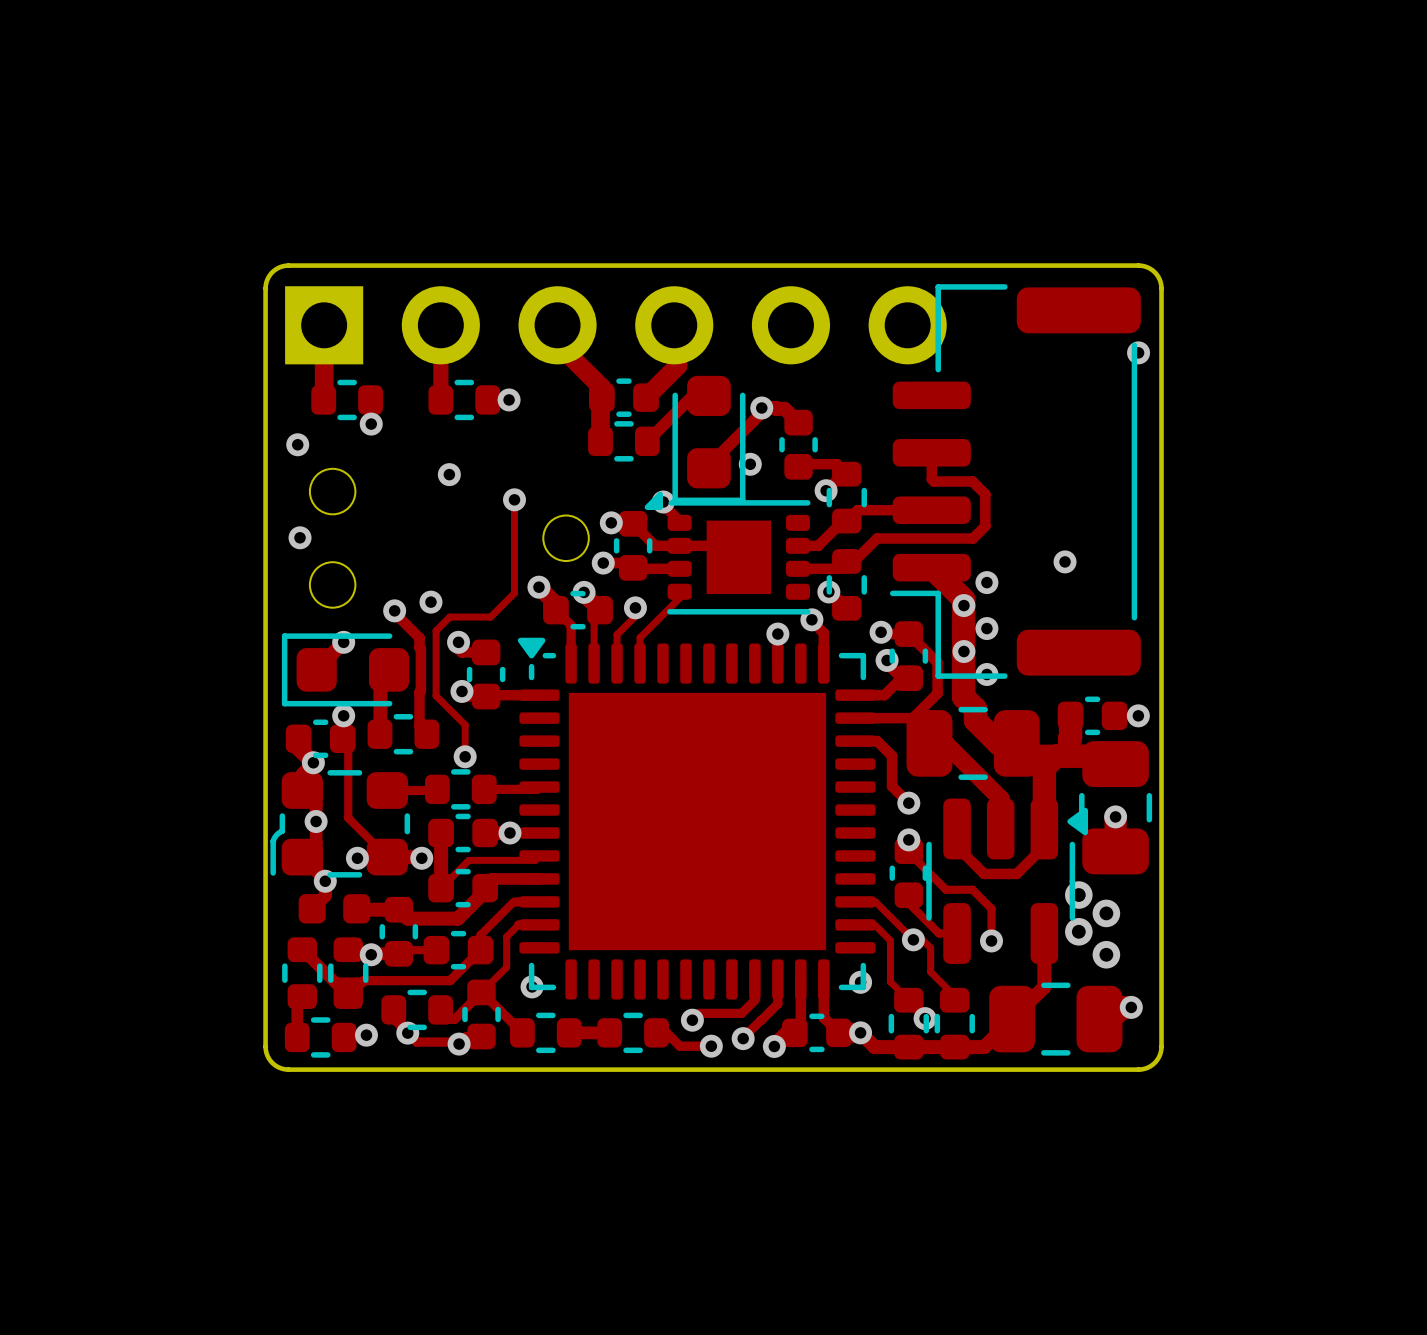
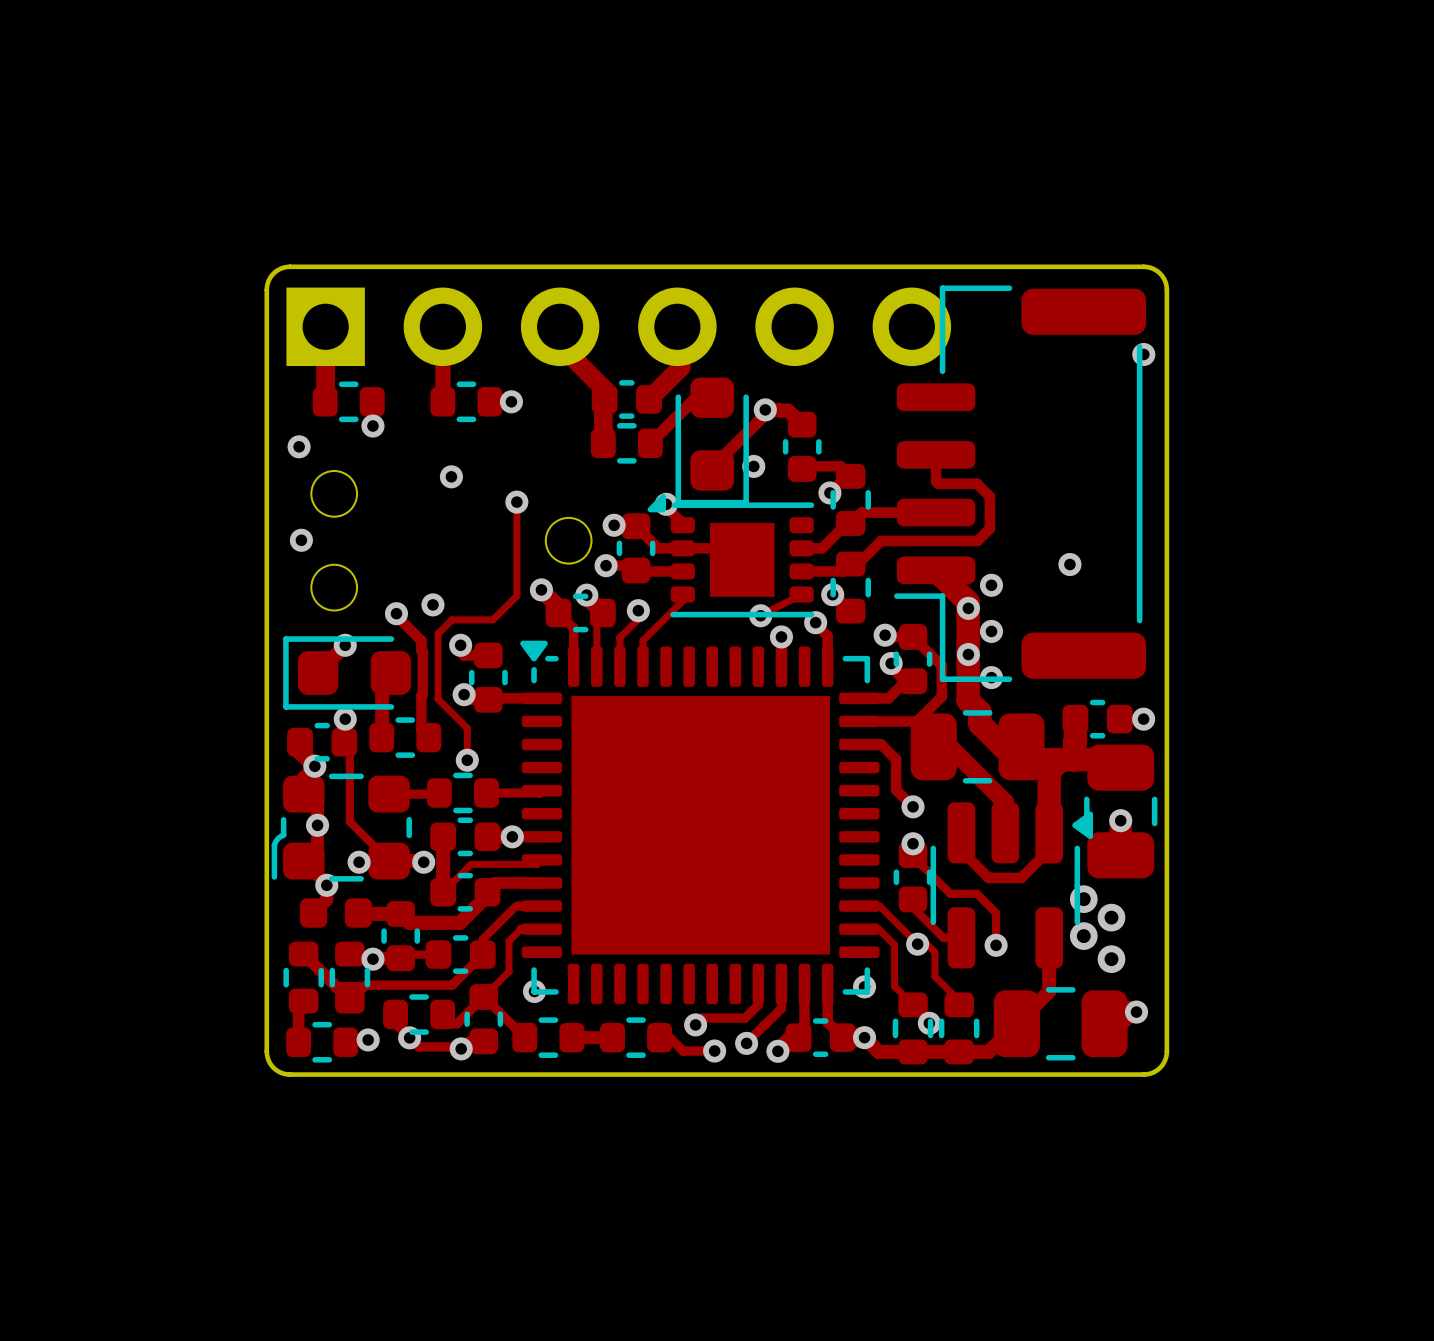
track: none -> (801, 594) (760, 615)
via: none -> (760, 615)

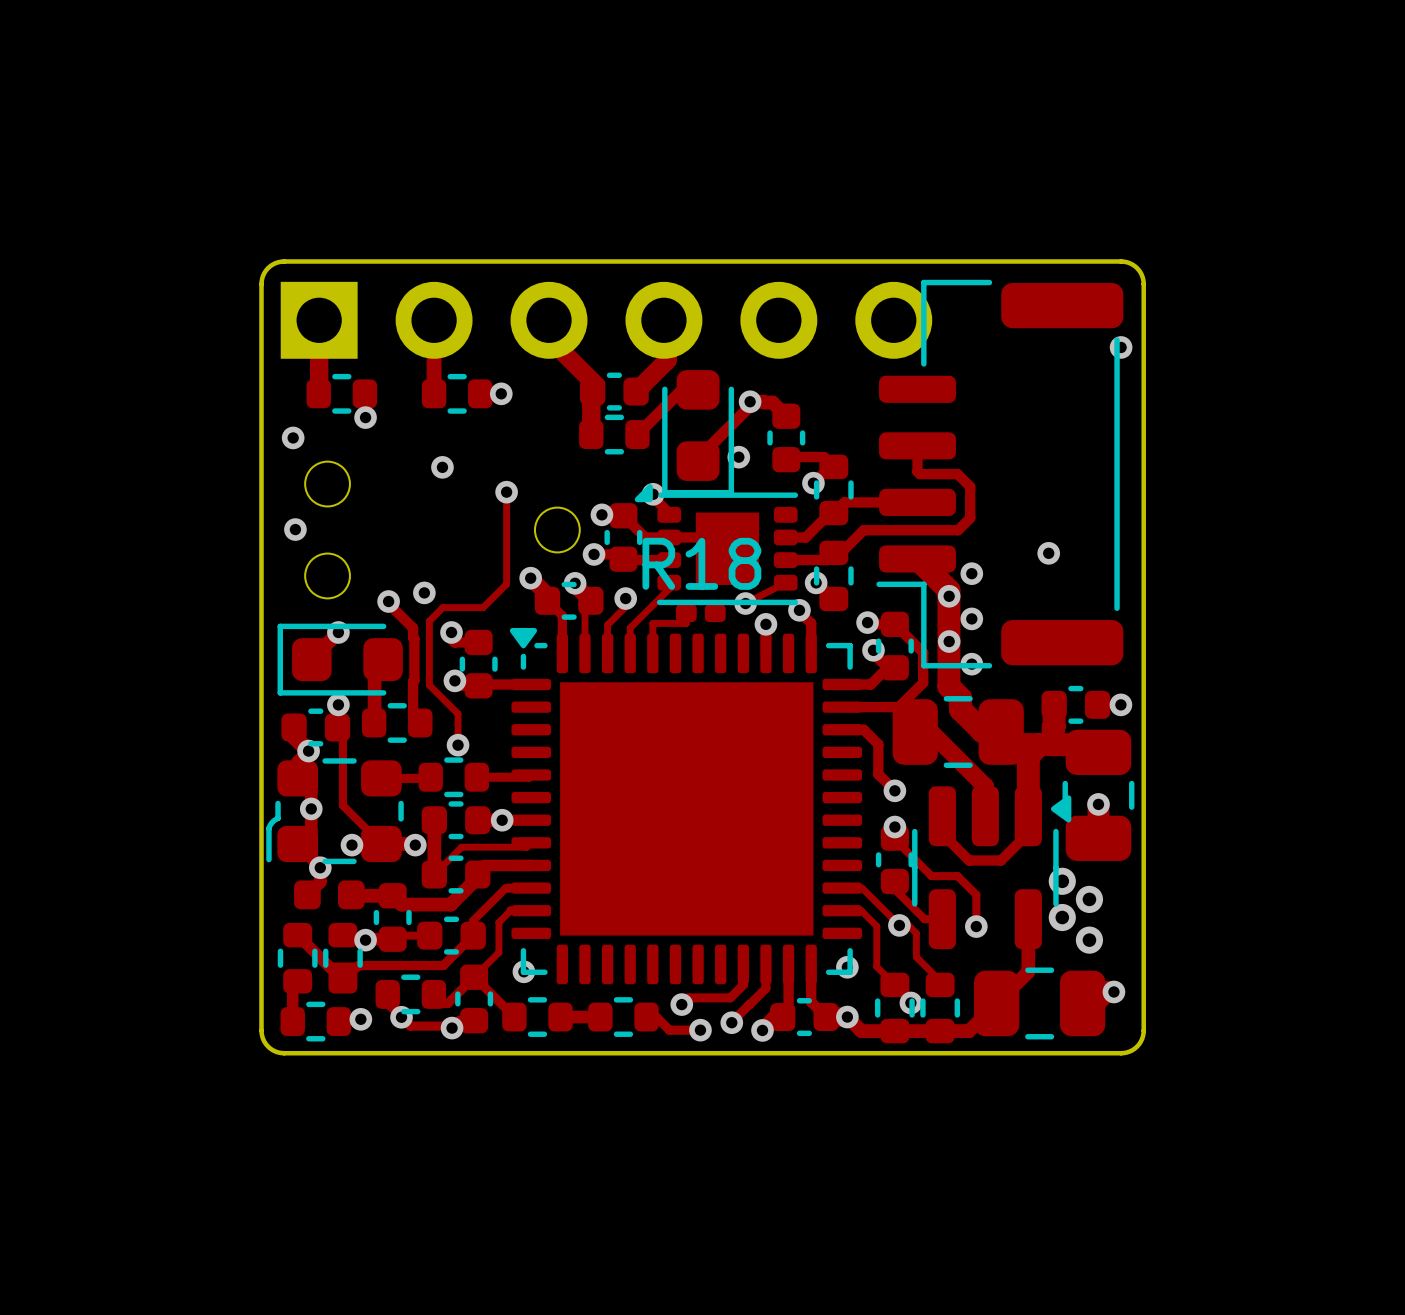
track: none -> (686, 613) (686, 623) (652, 623) (652, 653)
R18: none -> (700, 613)

